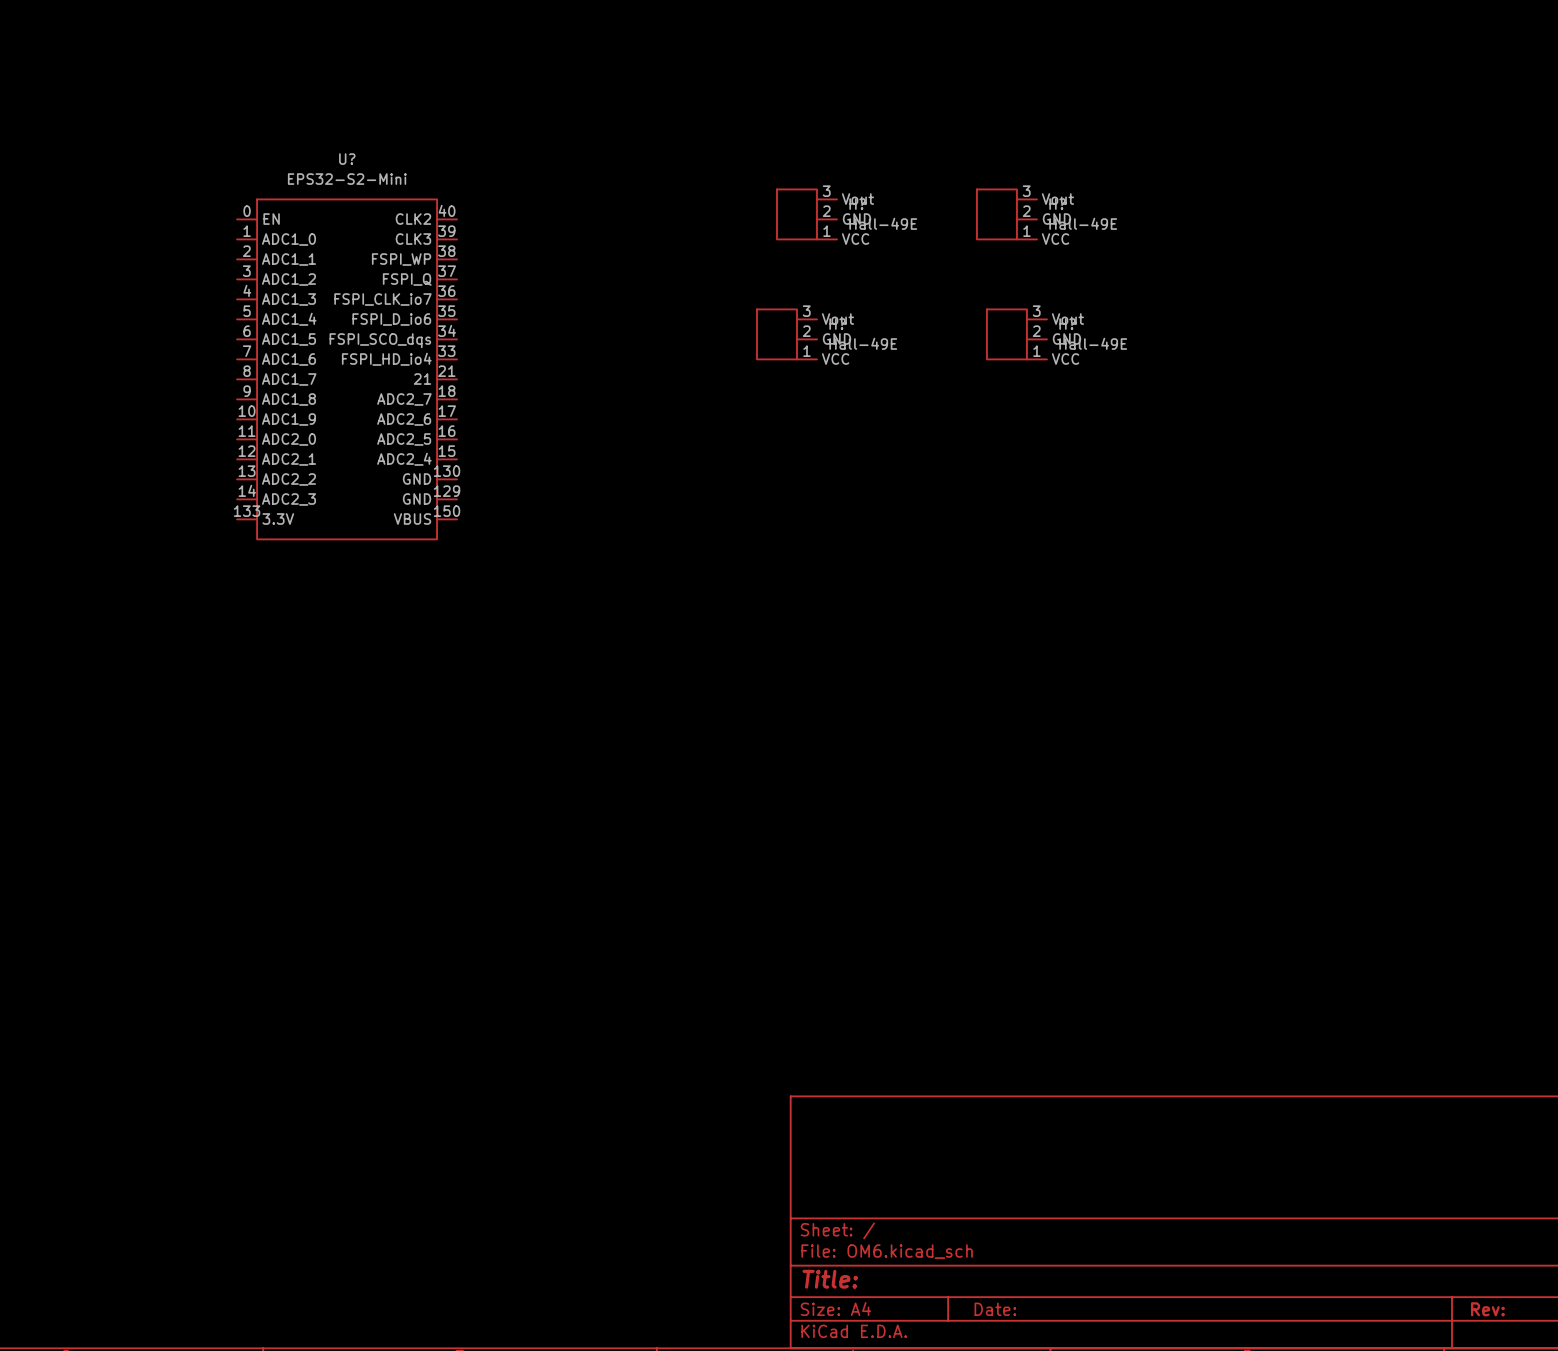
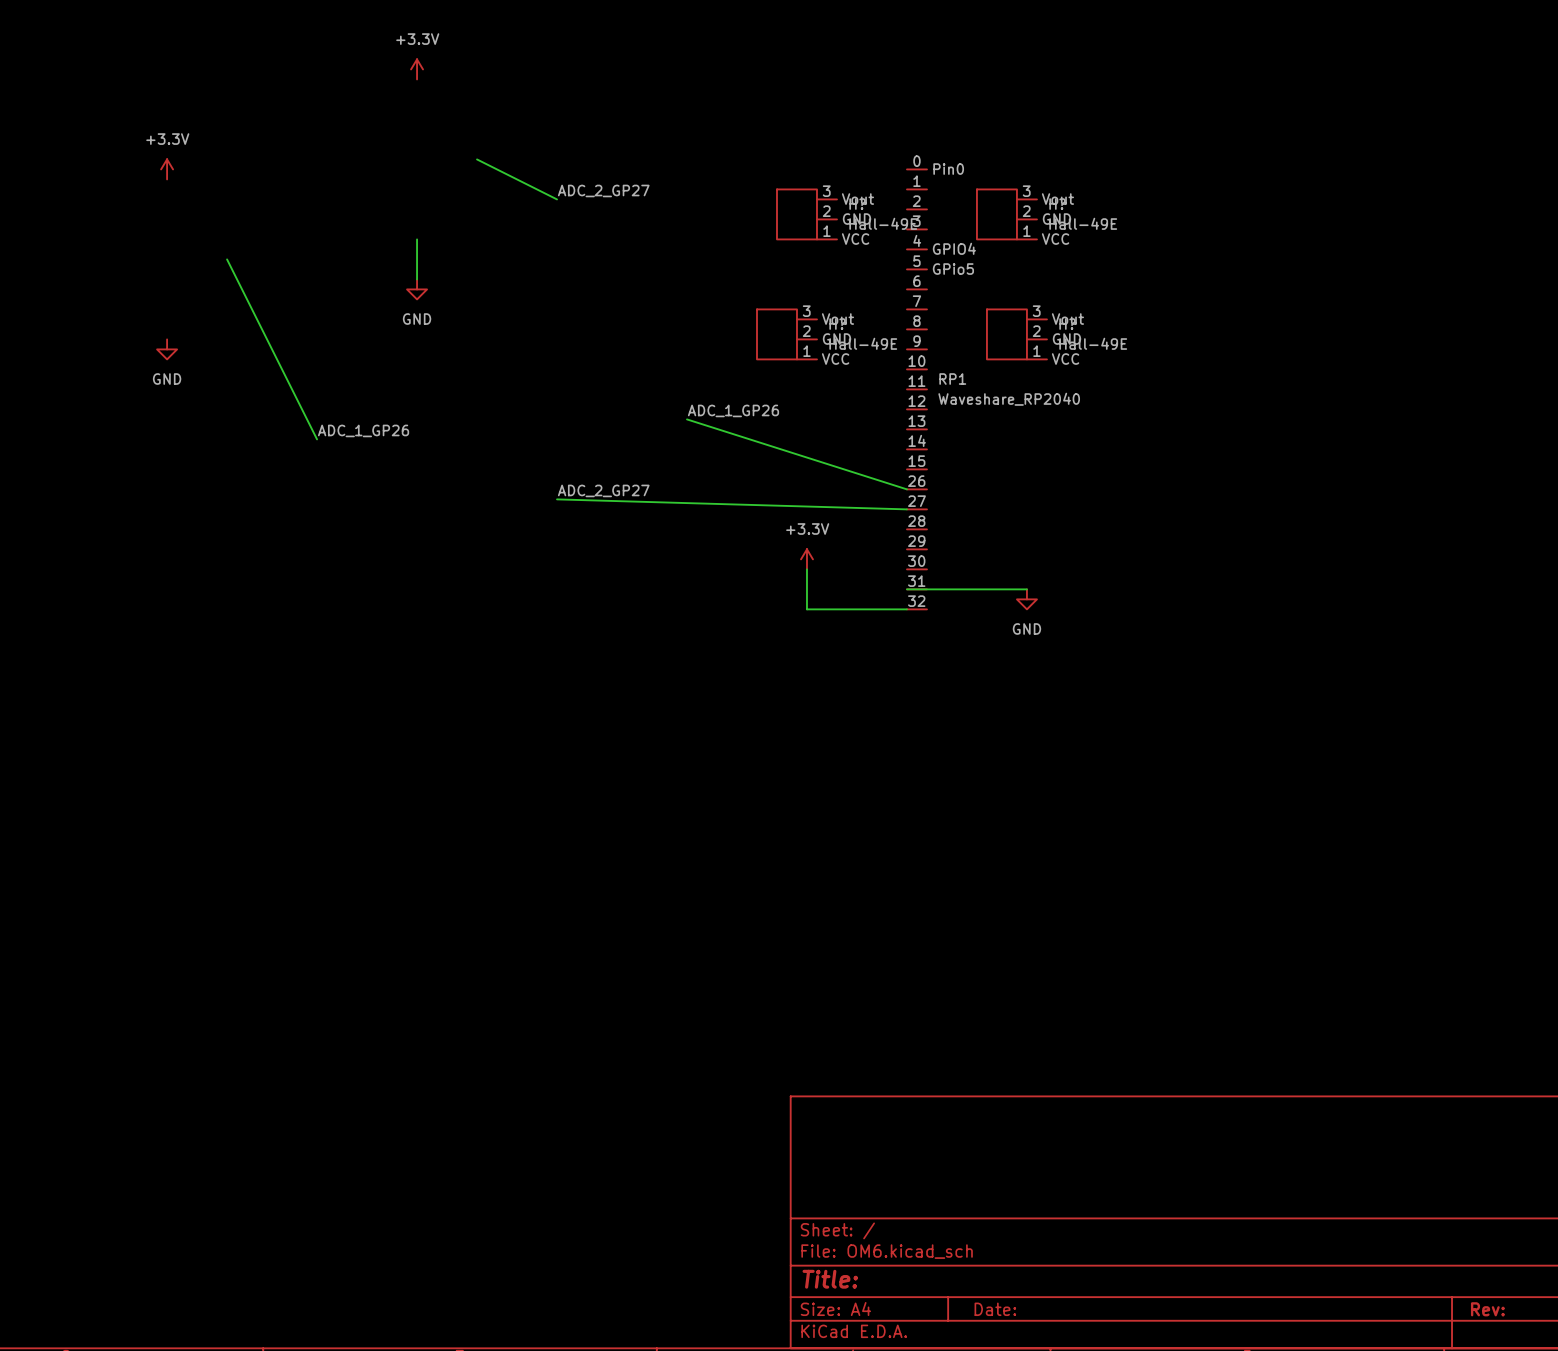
power symbol: none -> +3.3V (417, 69)
wire: none -> (477, 159) (557, 199)
power symbol: none -> +3.3V (167, 169)
label: none -> ADC_2_GP27 (603, 190)
wire: none -> (417, 239) (417, 279)
wire: none -> (227, 259) (317, 439)
power symbol: none -> GND (417, 289)
power symbol: none -> GND (167, 349)
U?: EPS32-S2-Mini (347, 369) -> none
RP1: none -> Waveshare_RP2040 (916, 389)
label: none -> ADC_1_GP26 (733, 410)
wire: none -> (687, 419) (906, 489)
label: none -> ADC_1_GP26 (363, 430)
label: none -> ADC_2_GP27 (603, 490)
wire: none -> (557, 499) (906, 509)
power symbol: none -> +3.3V (806, 559)
wire: none -> (806, 569) (806, 609) (906, 609)
wire: none -> (906, 589) (1026, 589)
power symbol: none -> GND (1026, 599)

